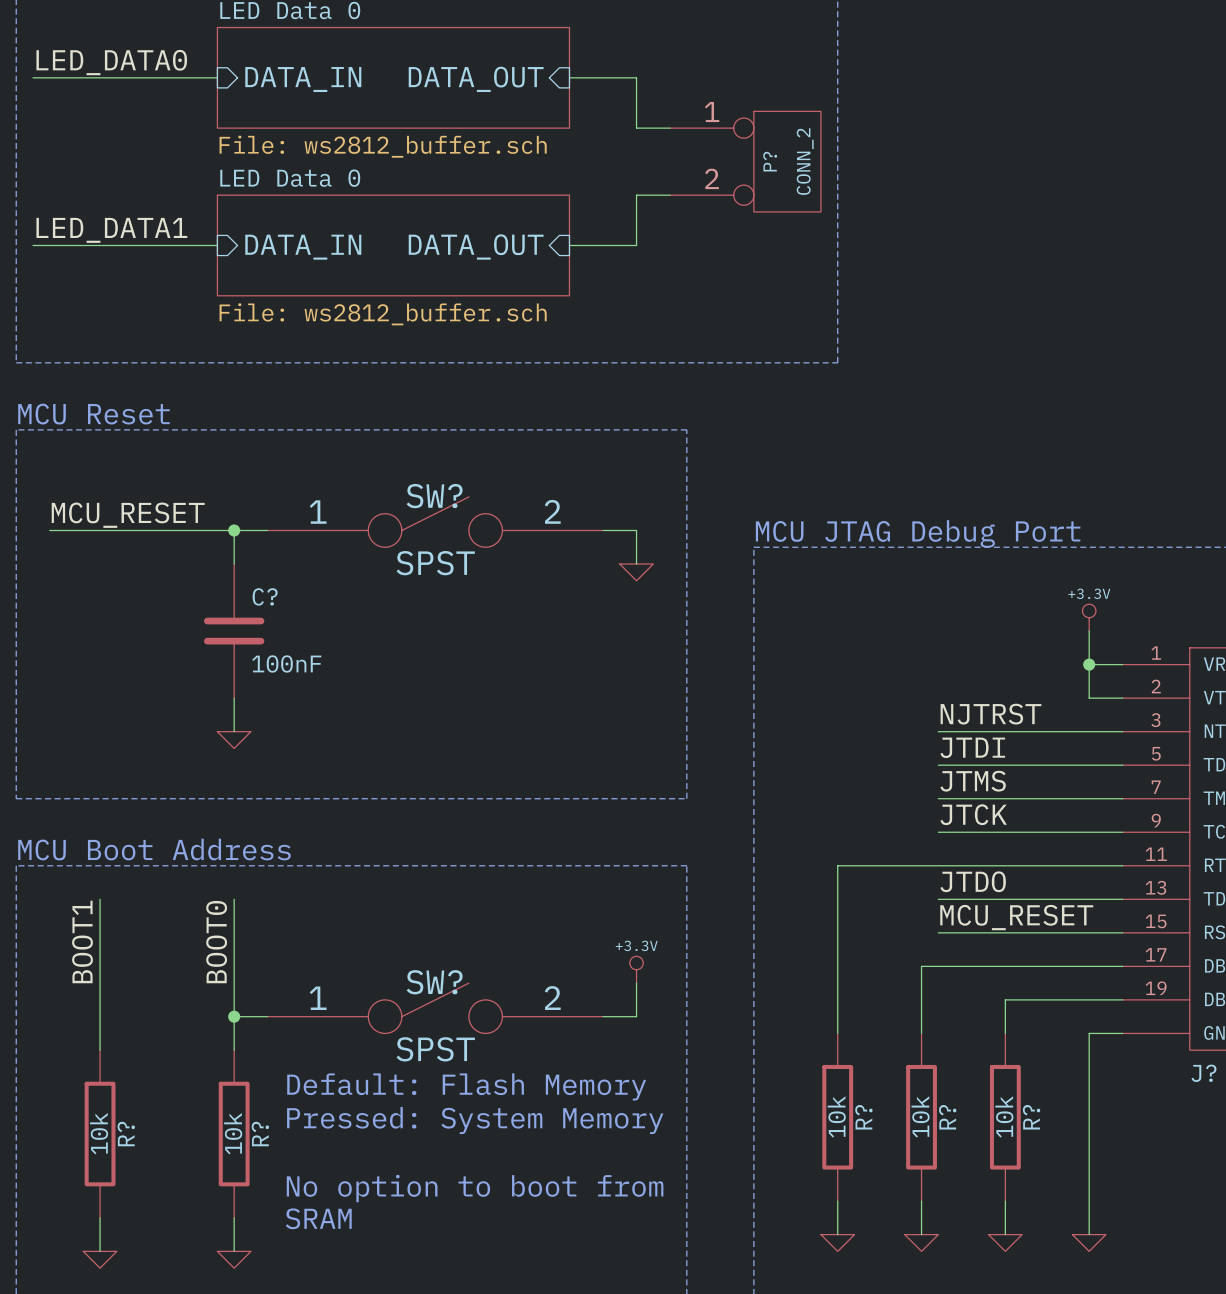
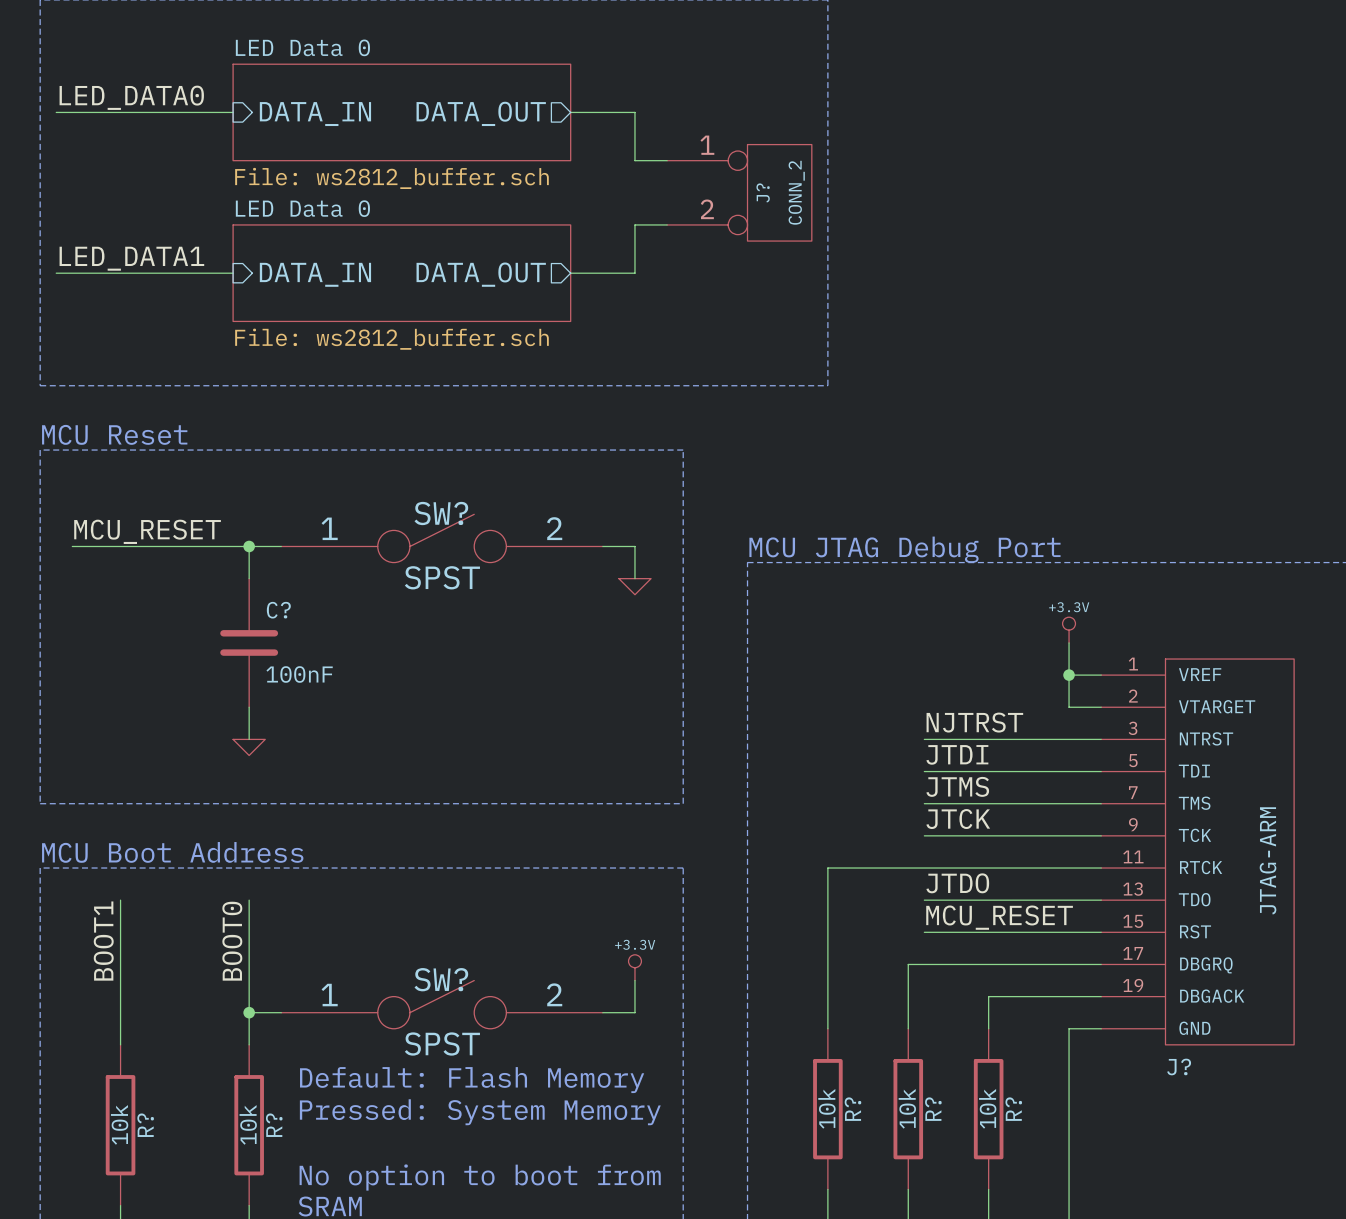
sheet pin shape: input (476, 79) -> output (481, 113)
P? name: P? (770, 161) -> J? (763, 192)
sheet pin shape: input (476, 247) -> output (481, 274)

